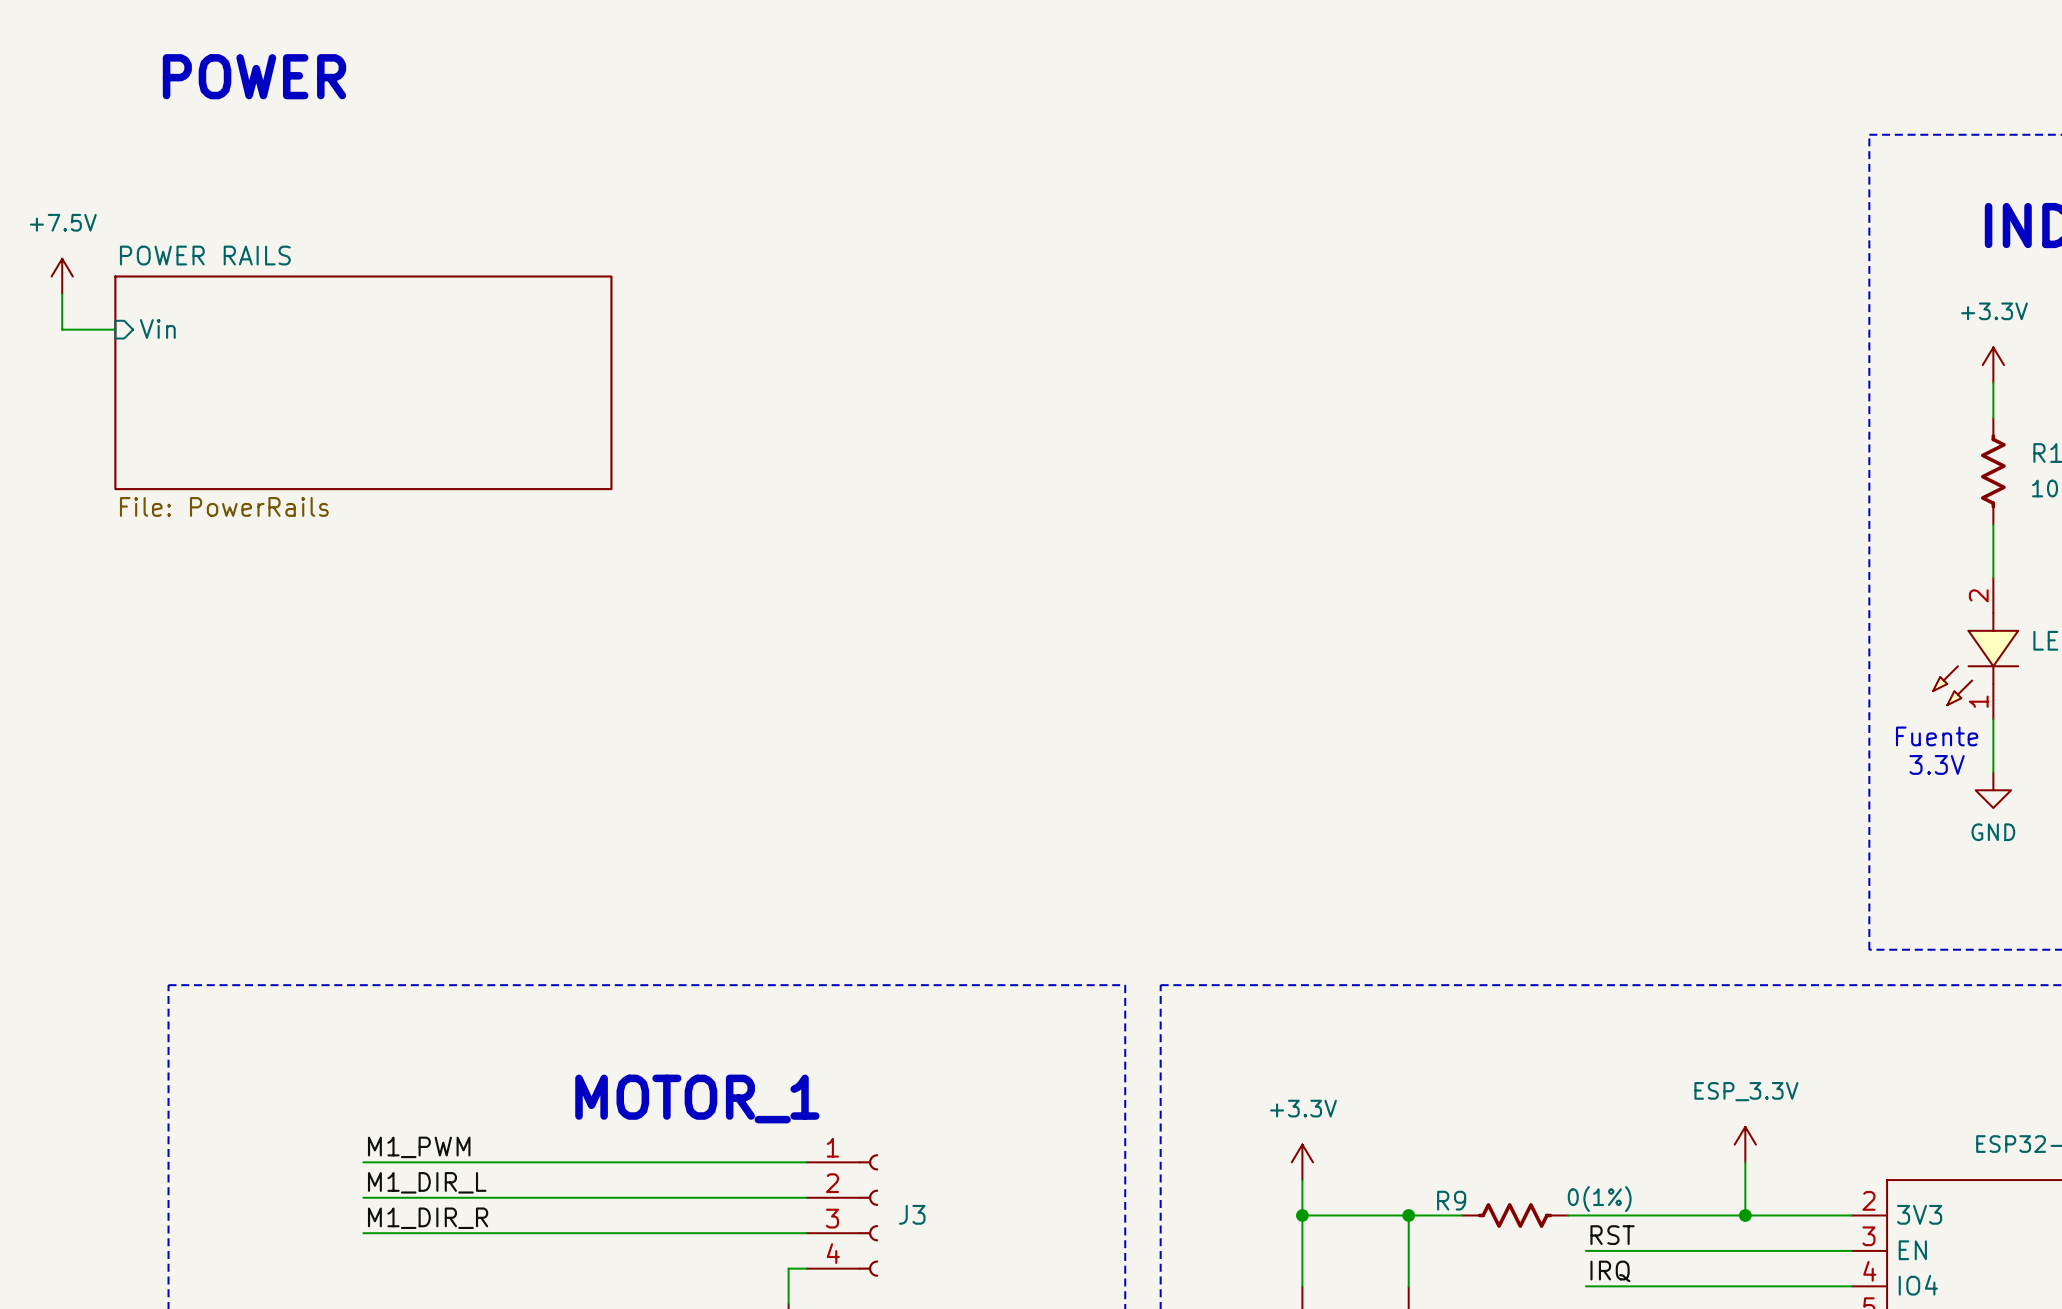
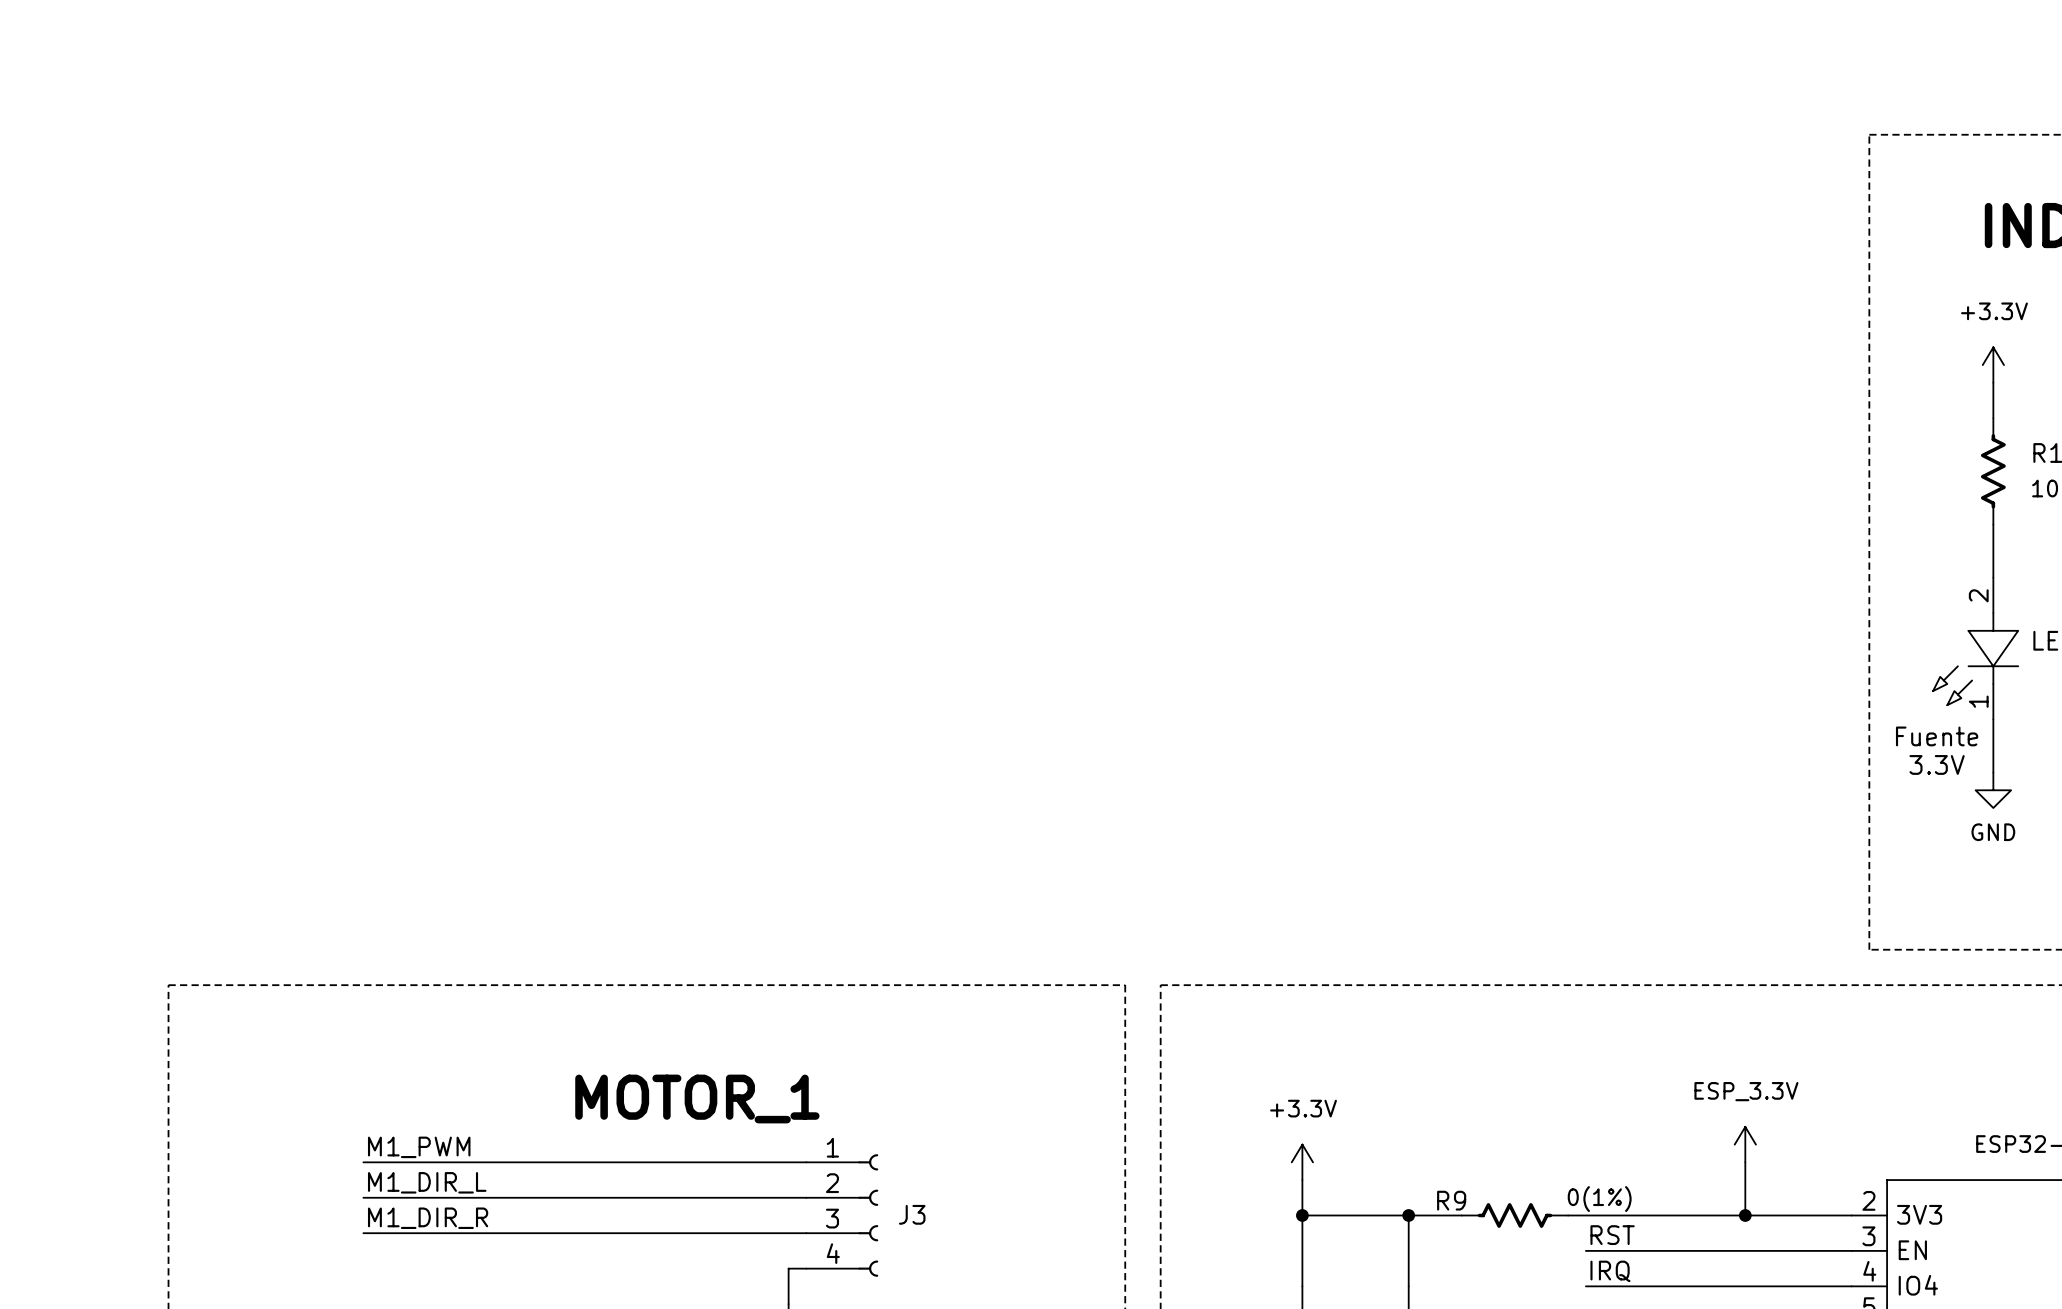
text: POWER (254, 76) -> none
power symbol: +7.5V (62, 276) -> none
wire: (62, 294) (62, 329) (115, 329) -> none
sheet pin: Vin (157, 328) -> none
sheet POWER RAILS: File: PowerRails (363, 382) -> none

